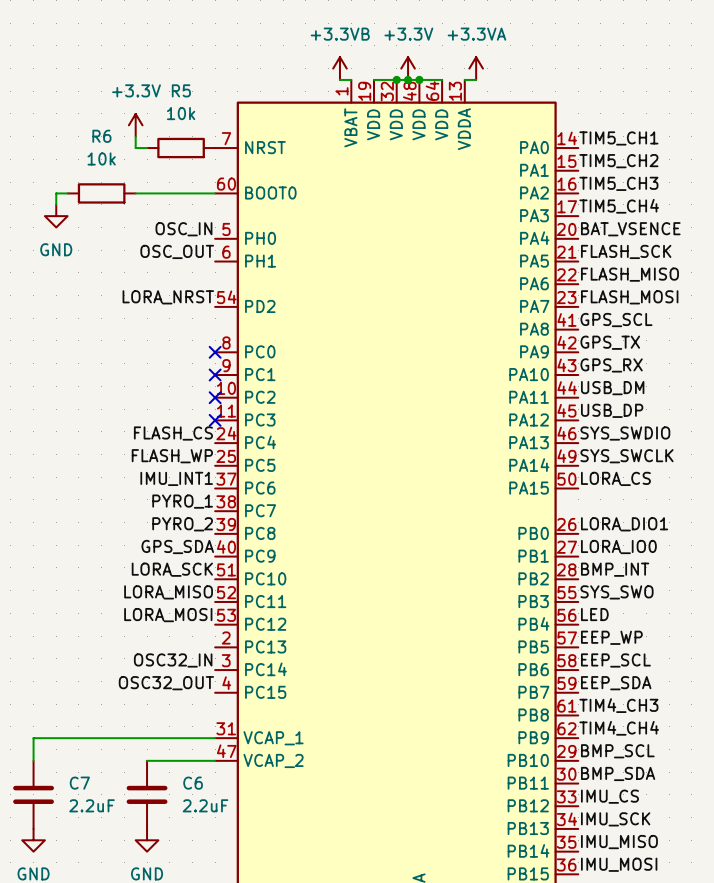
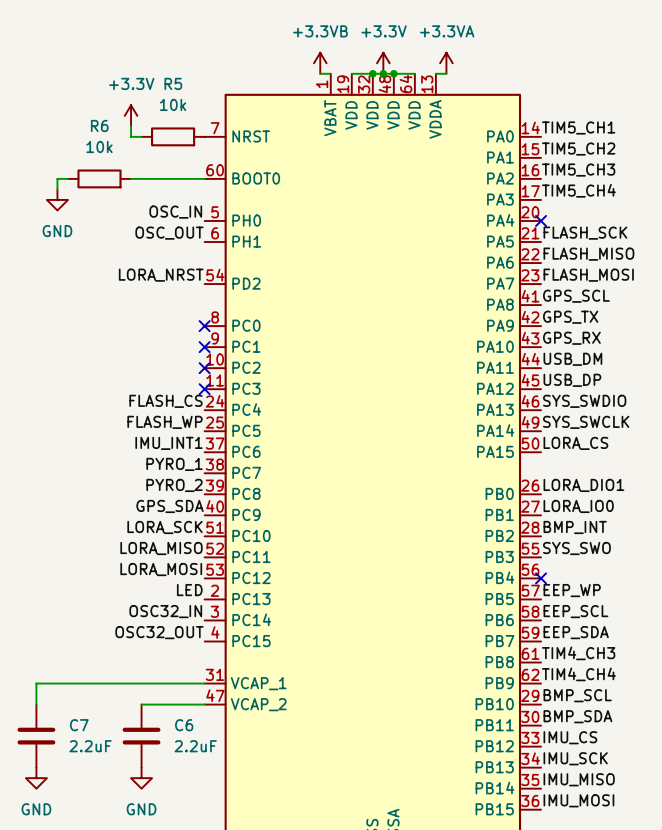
label: BAT_VSENCE (630, 229) -> none
no-connect mark: none -> (541, 220)
label: LED (594, 614) -> none
no-connect mark: none -> (541, 578)
label: none -> LED (189, 590)

